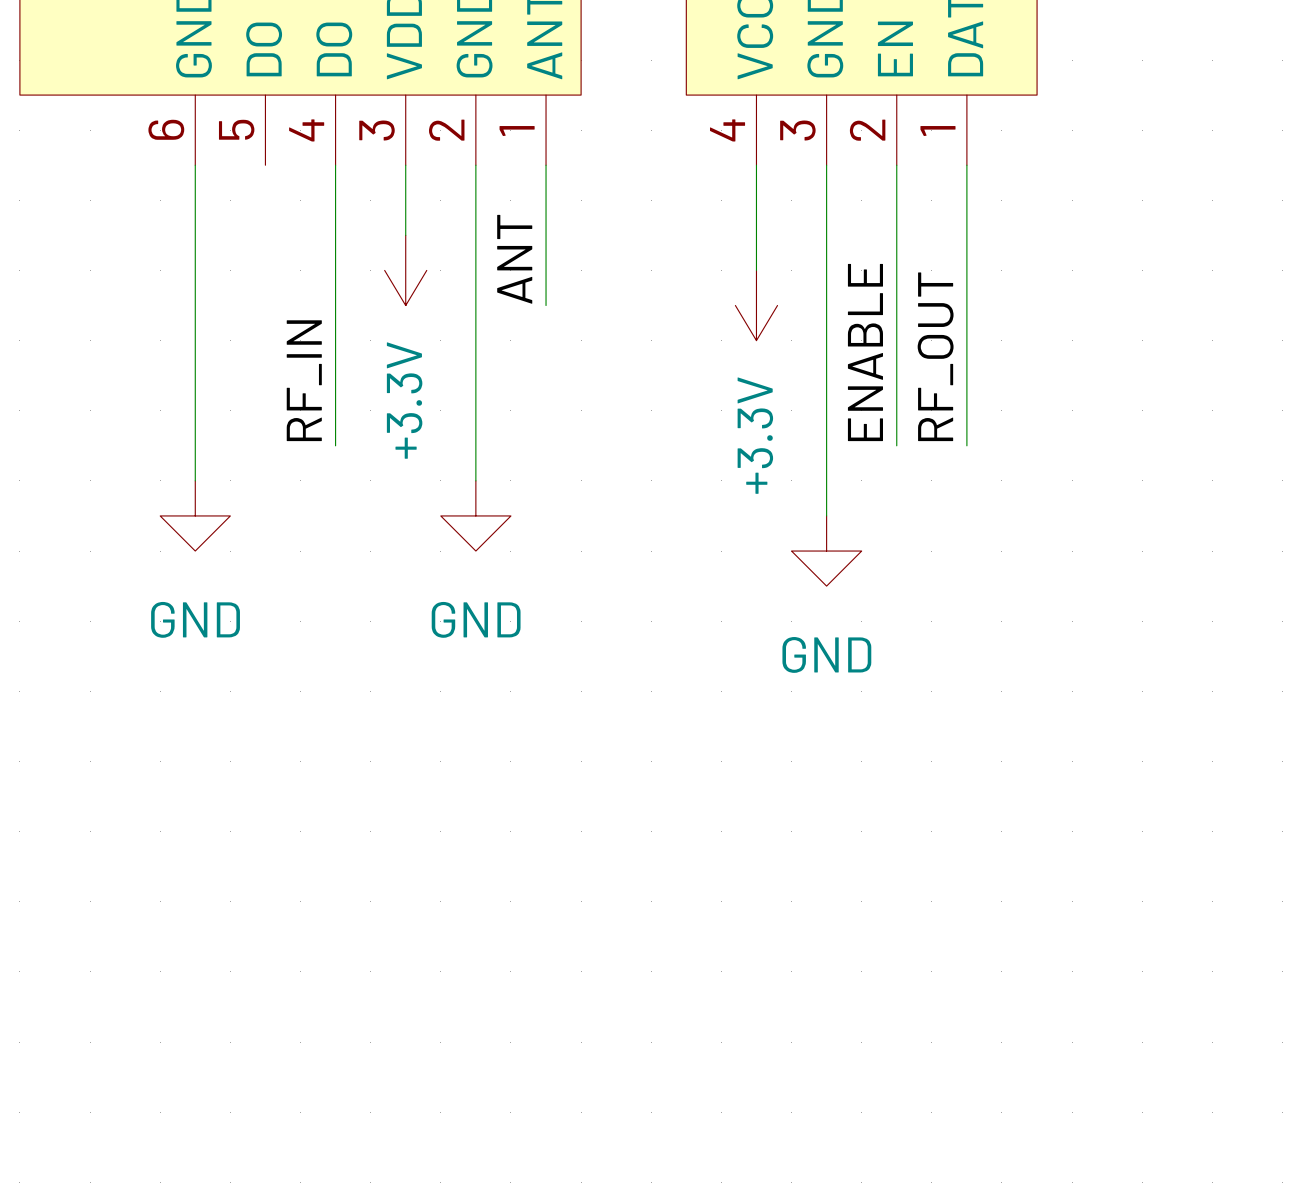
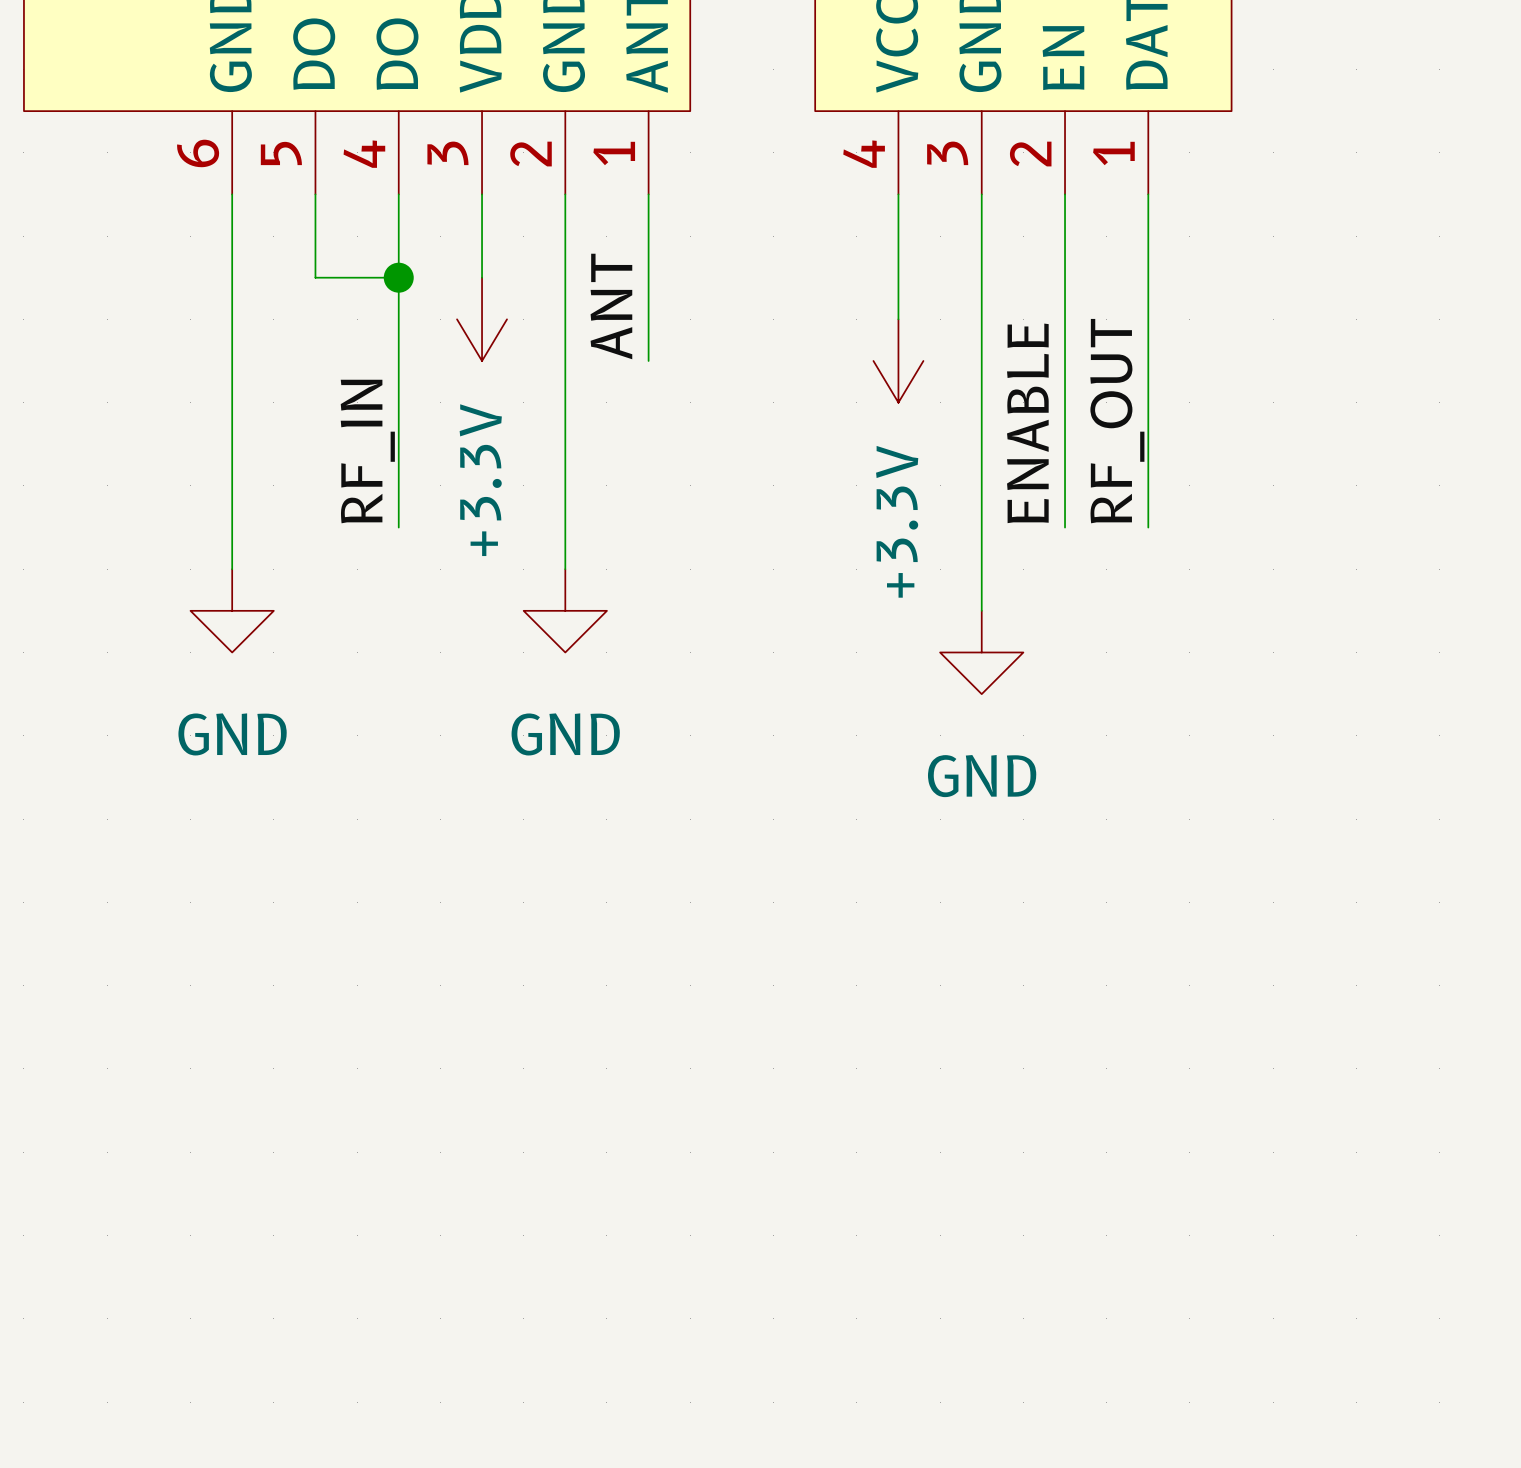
wire: none -> (315, 194) (315, 277) (398, 277)
junction: none -> (398, 277)

